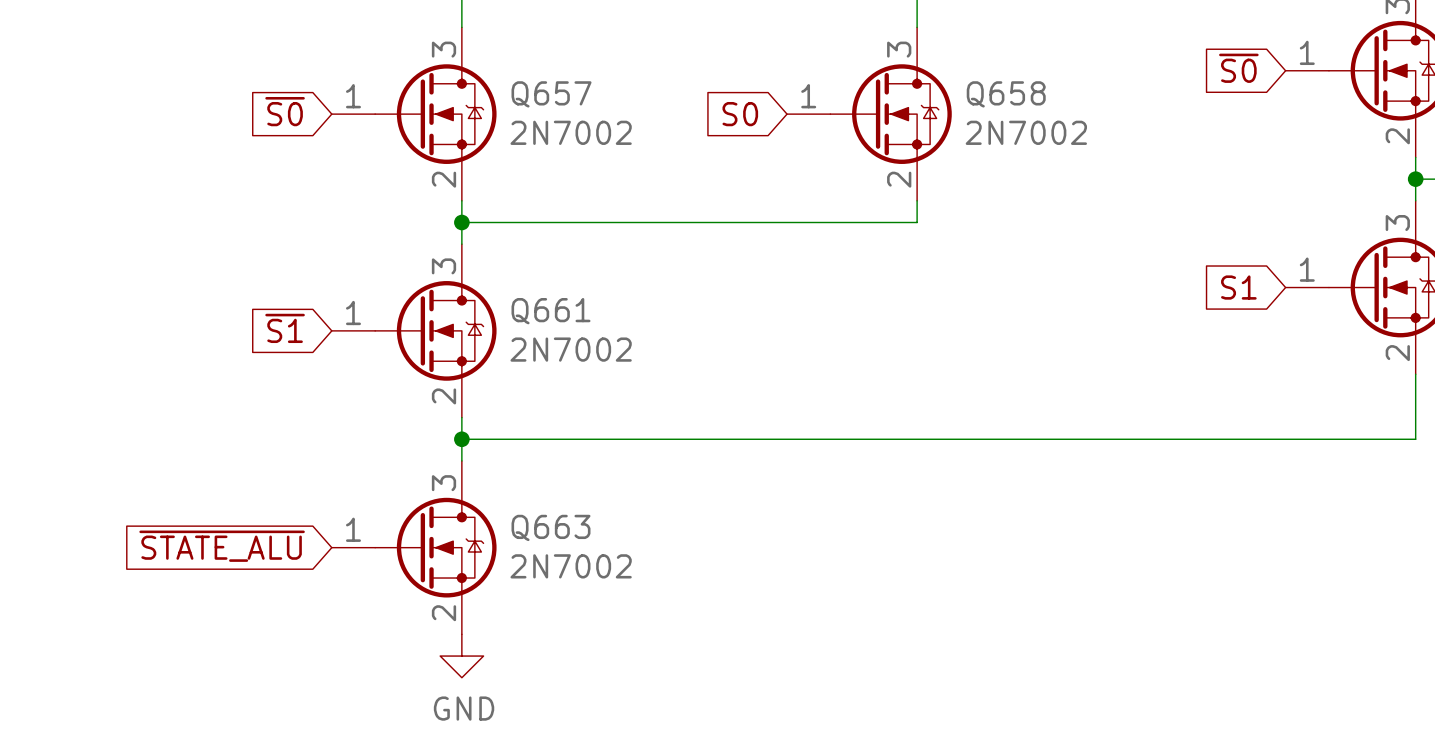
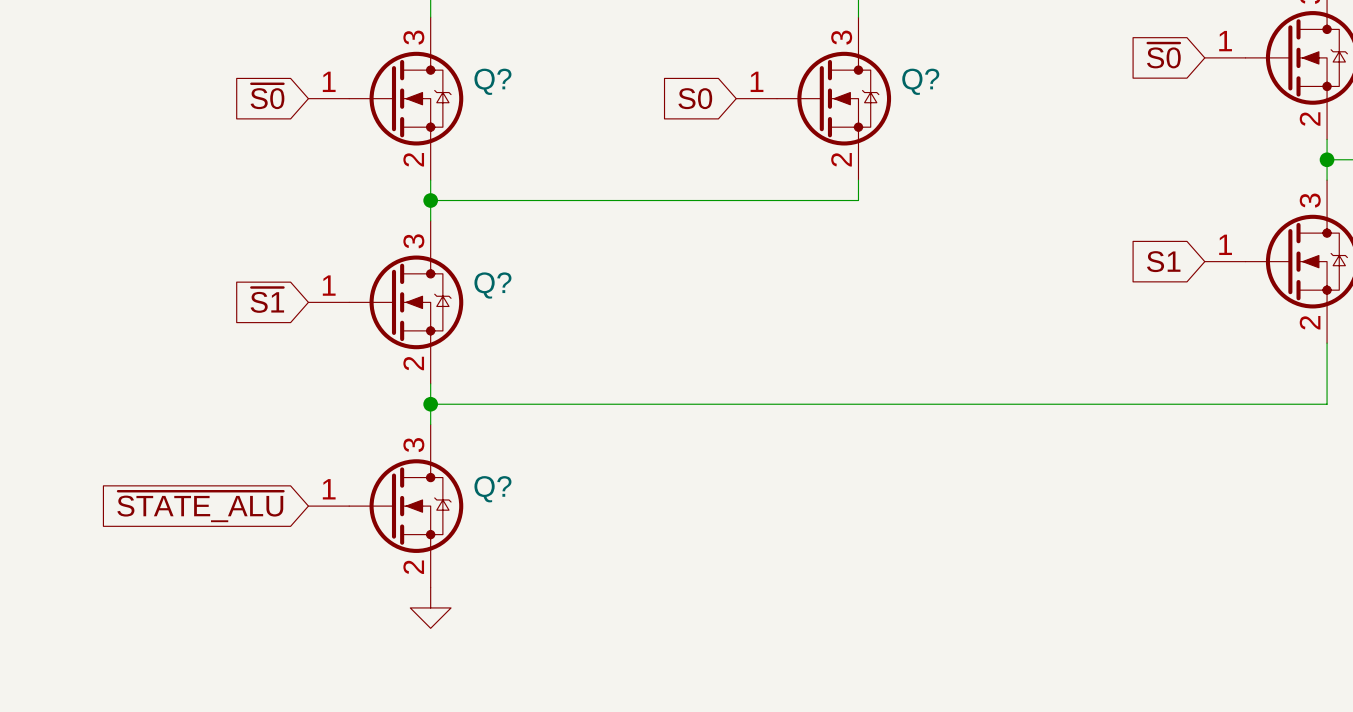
Q657 name: Q657 (551, 94) -> Q? (492, 81)
Q658 name: Q658 (1006, 94) -> Q? (920, 81)
Q657 value: 2N7002 (571, 132) -> none
Q658 value: 2N7002 (1026, 132) -> none
Q661 name: Q661 (550, 311) -> Q? (492, 285)
Q661 value: 2N7002 (571, 349) -> none
Q663 name: Q663 (550, 527) -> Q? (492, 489)
Q663 value: 2N7002 (571, 566) -> none
power symbol text: GND (464, 708) -> none

